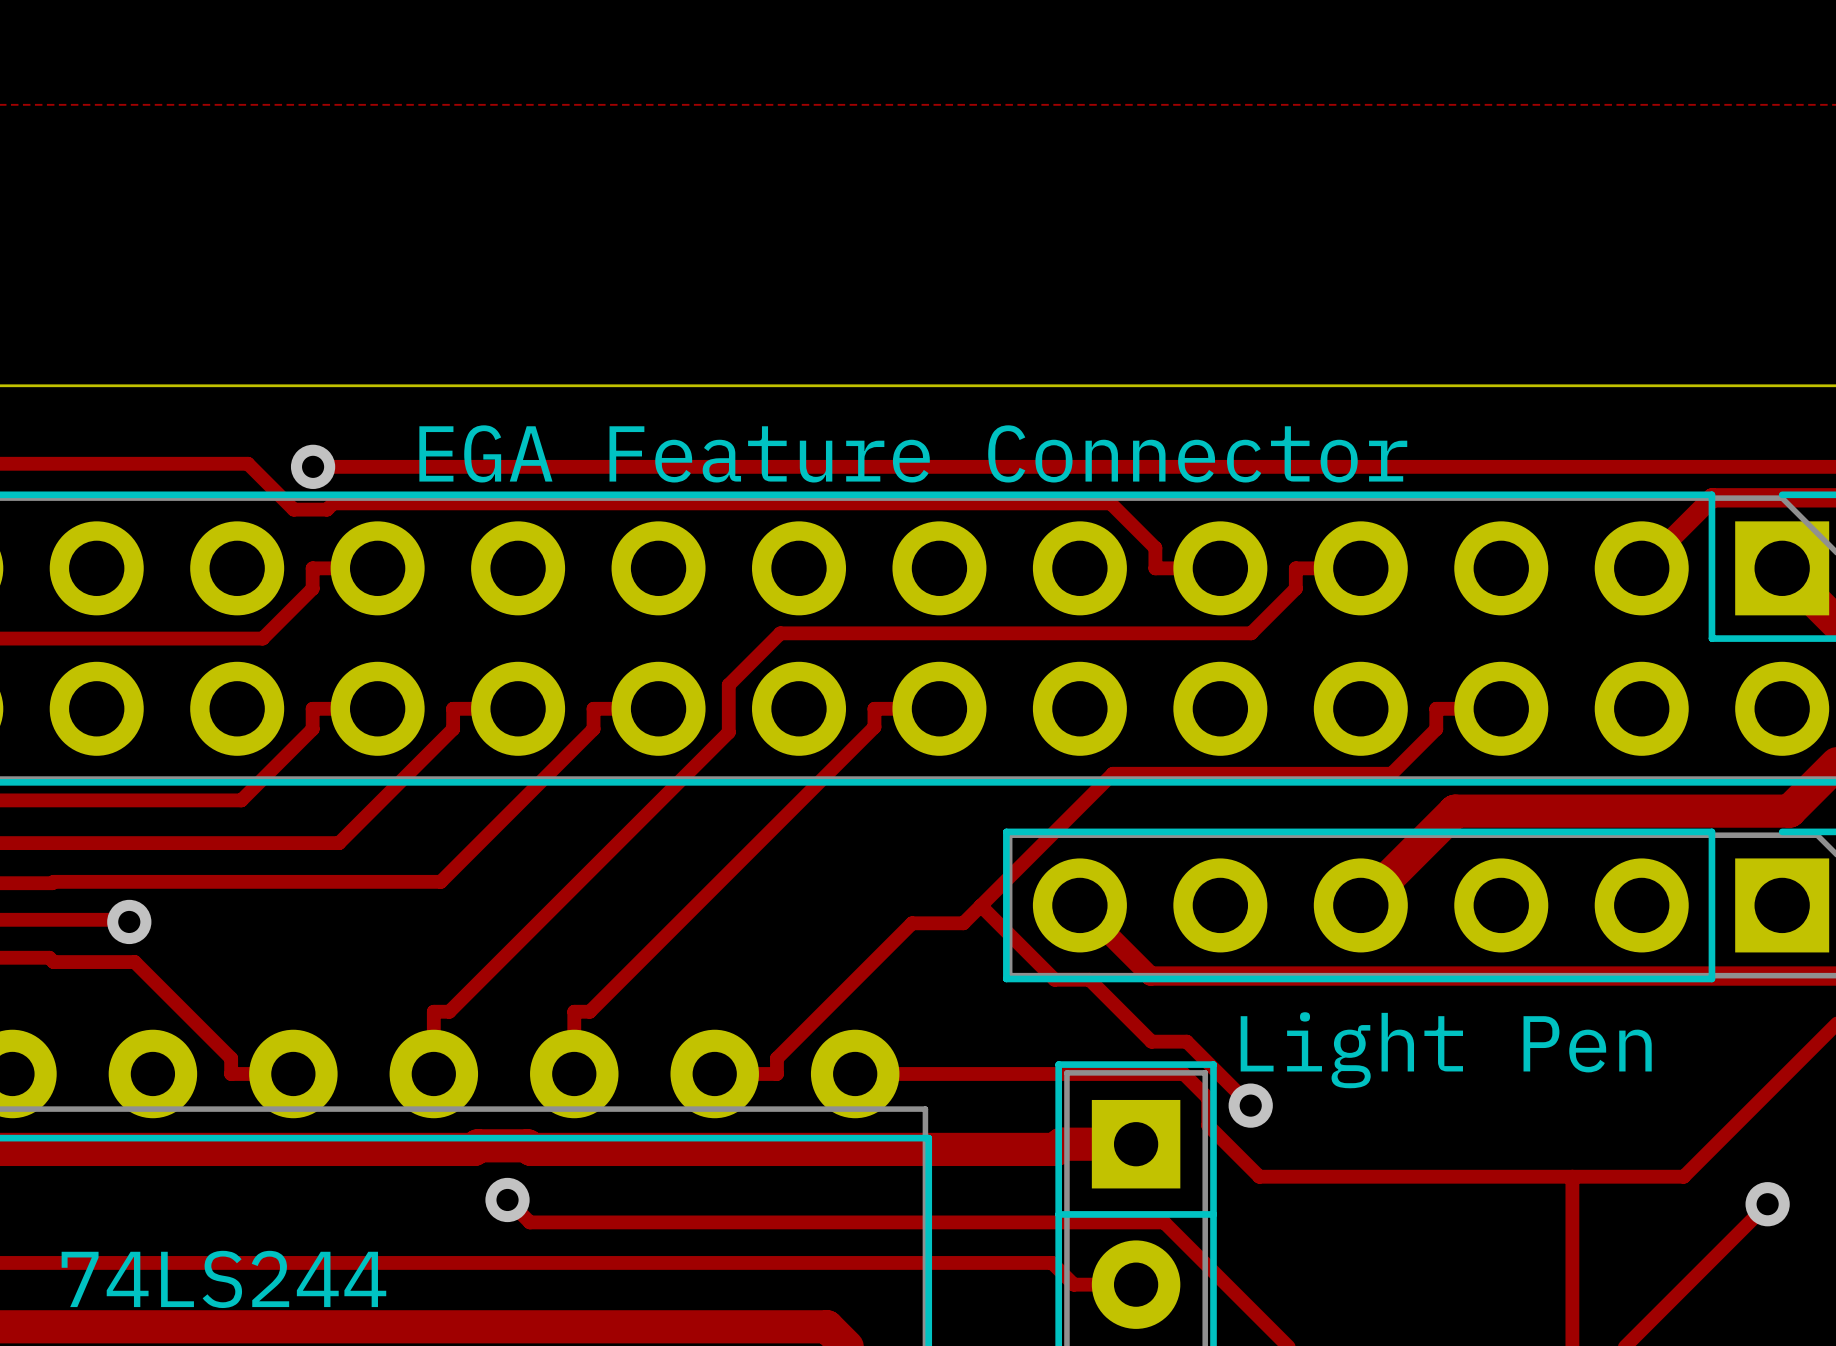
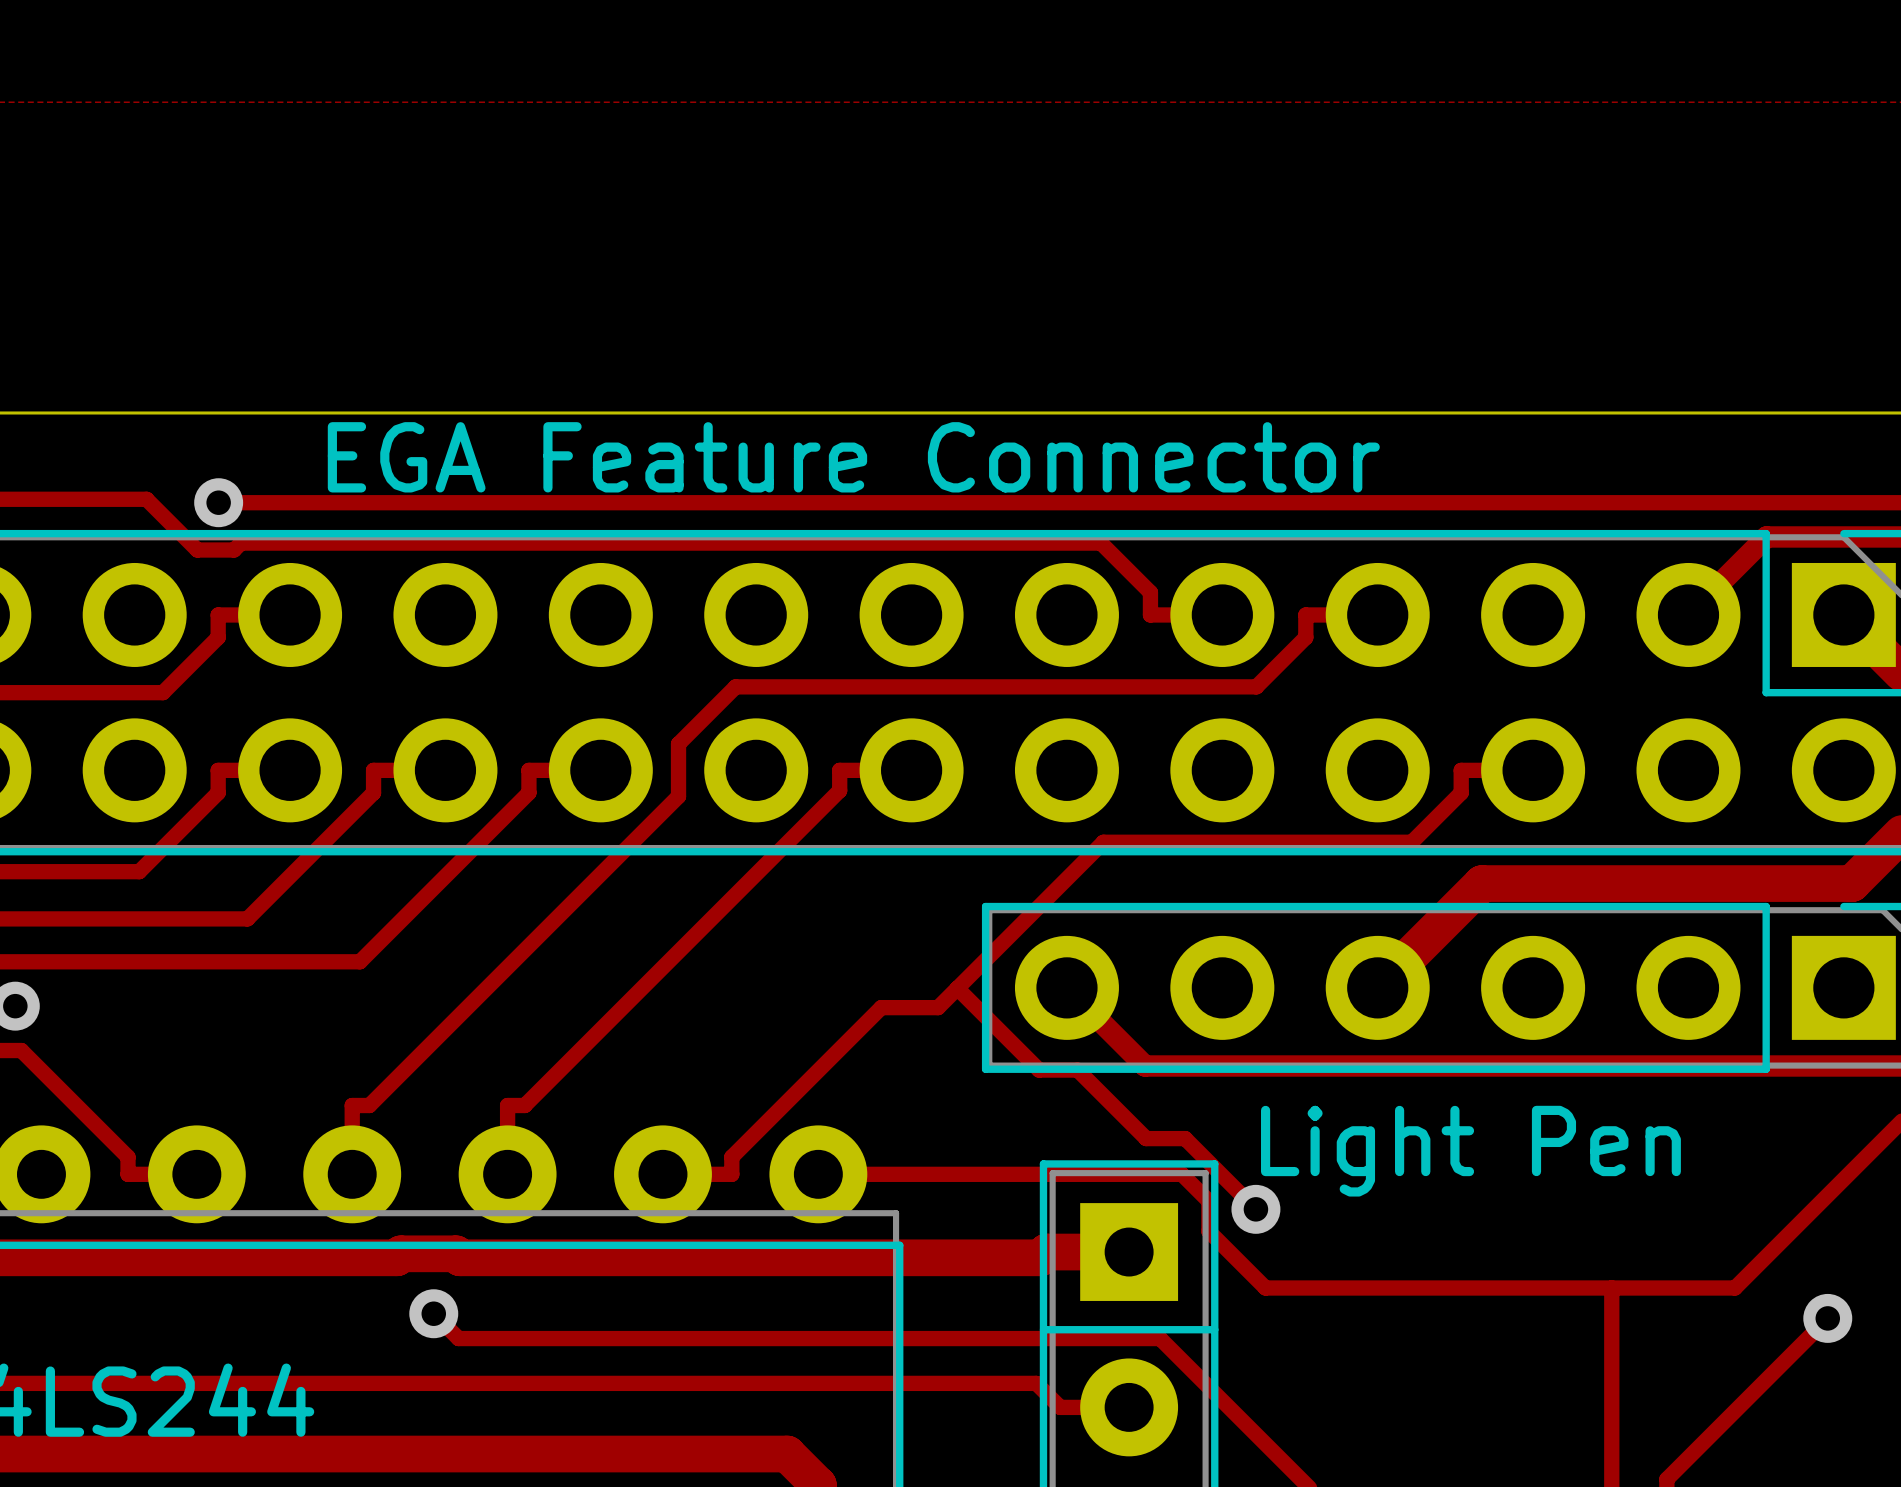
part value position: EGA Feature Connector (913, 453) -> EGA Feature Connector (853, 457)

